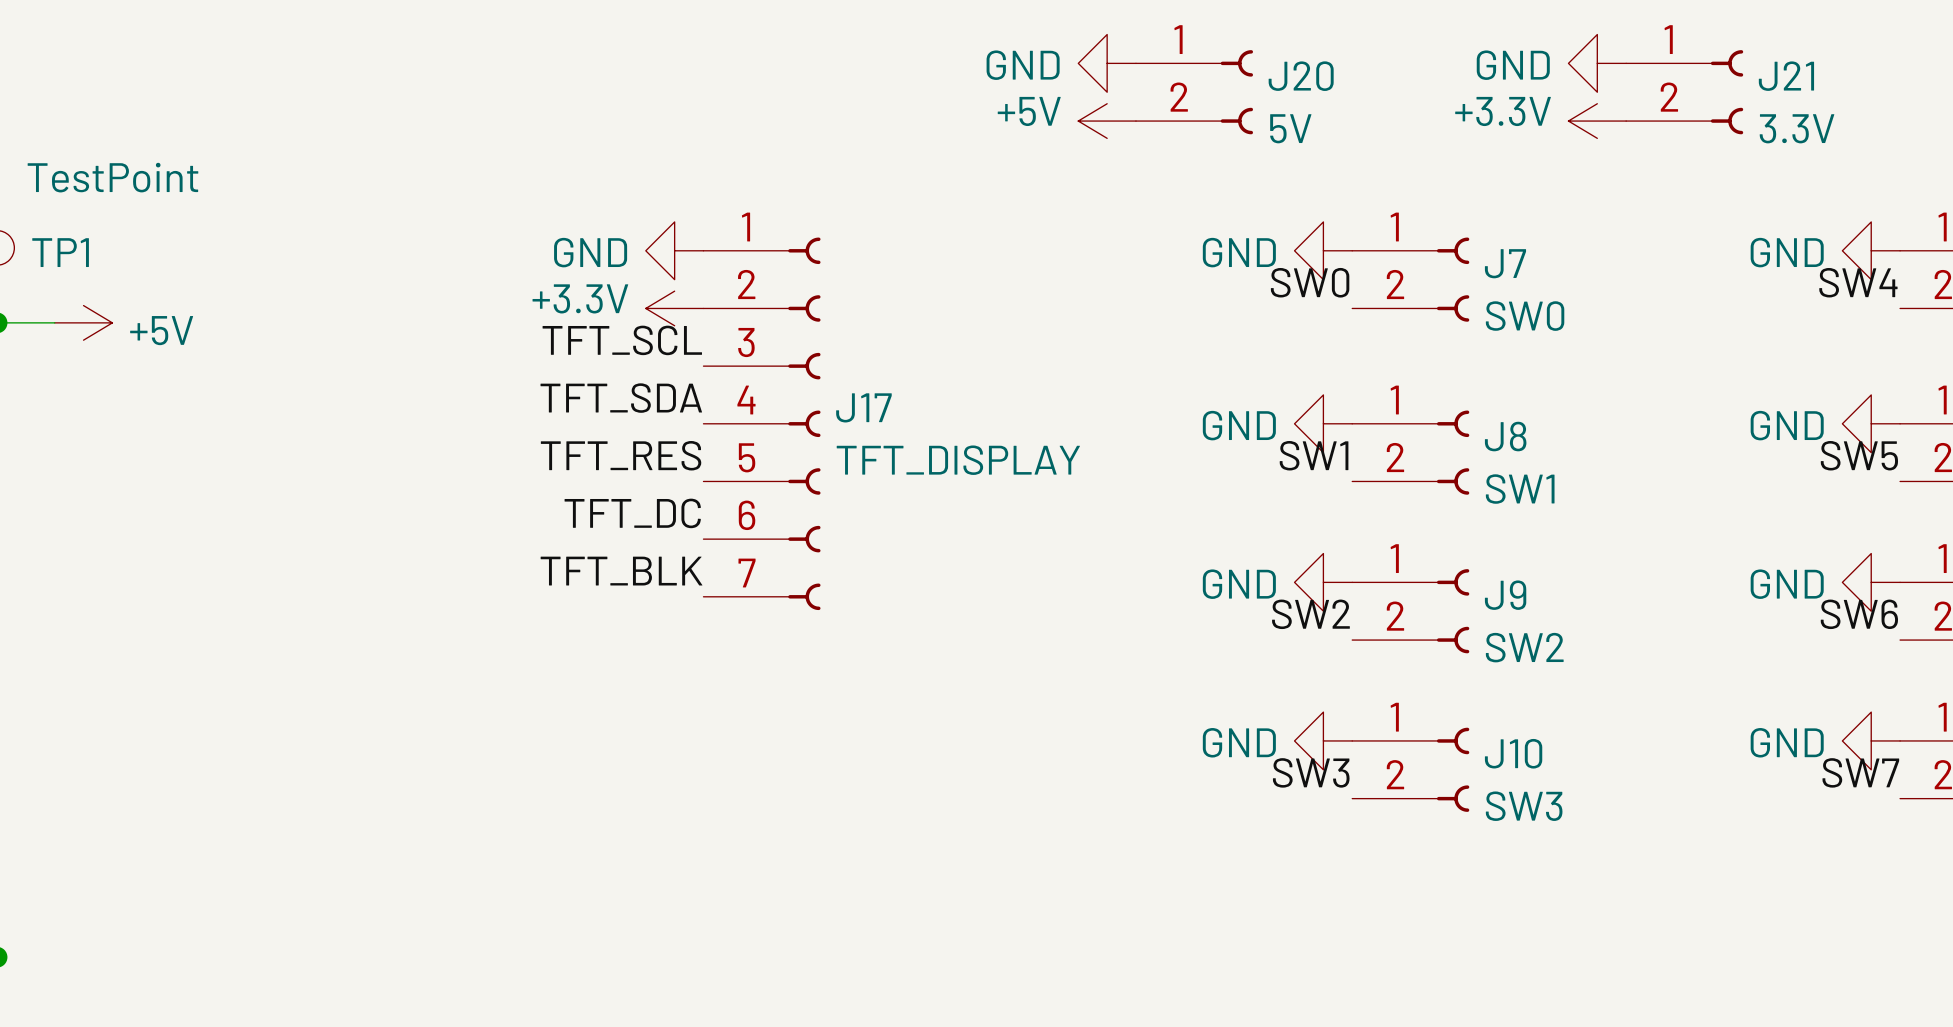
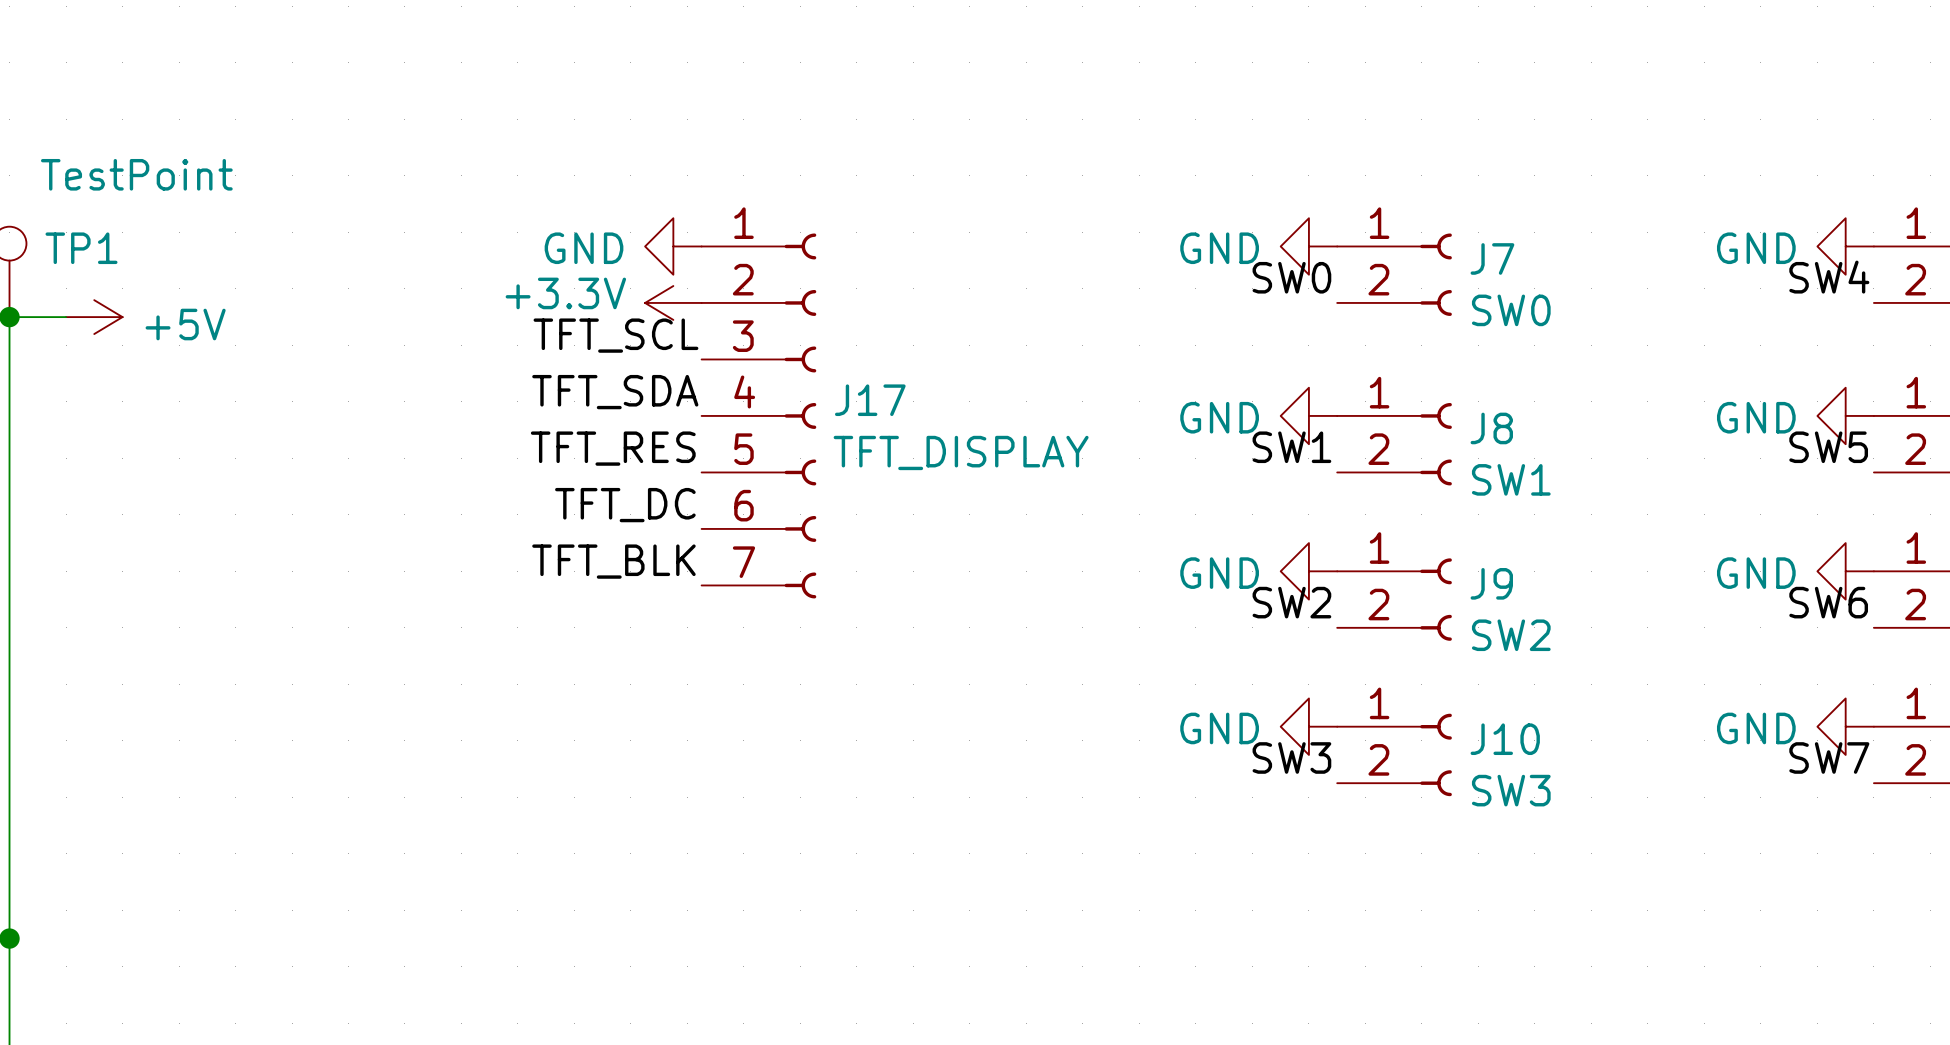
power symbol: GND (1107, 63) -> none
power symbol: GND (1597, 63) -> none
J20: 5V (1194, 92) -> none
J21: 3.3V (1684, 92) -> none
power symbol: +5V (1107, 121) -> none
power symbol: +3.3V (1597, 121) -> none

